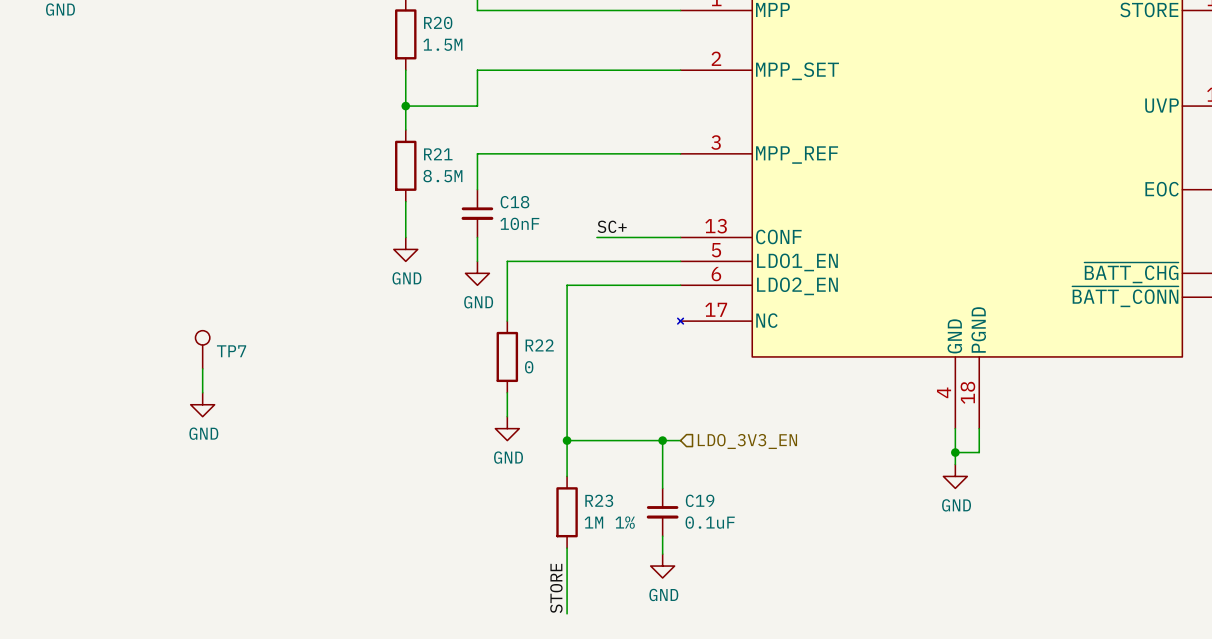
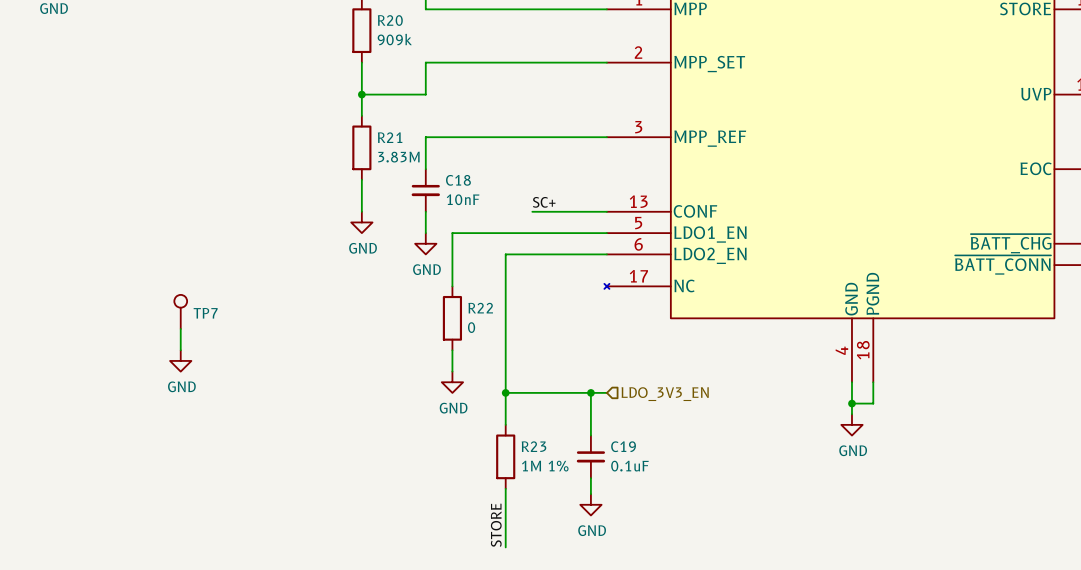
R20 value: 1.5M (442, 44) -> 909k (394, 39)
R21 value: 8.5M (442, 176) -> 3.83M (398, 157)

